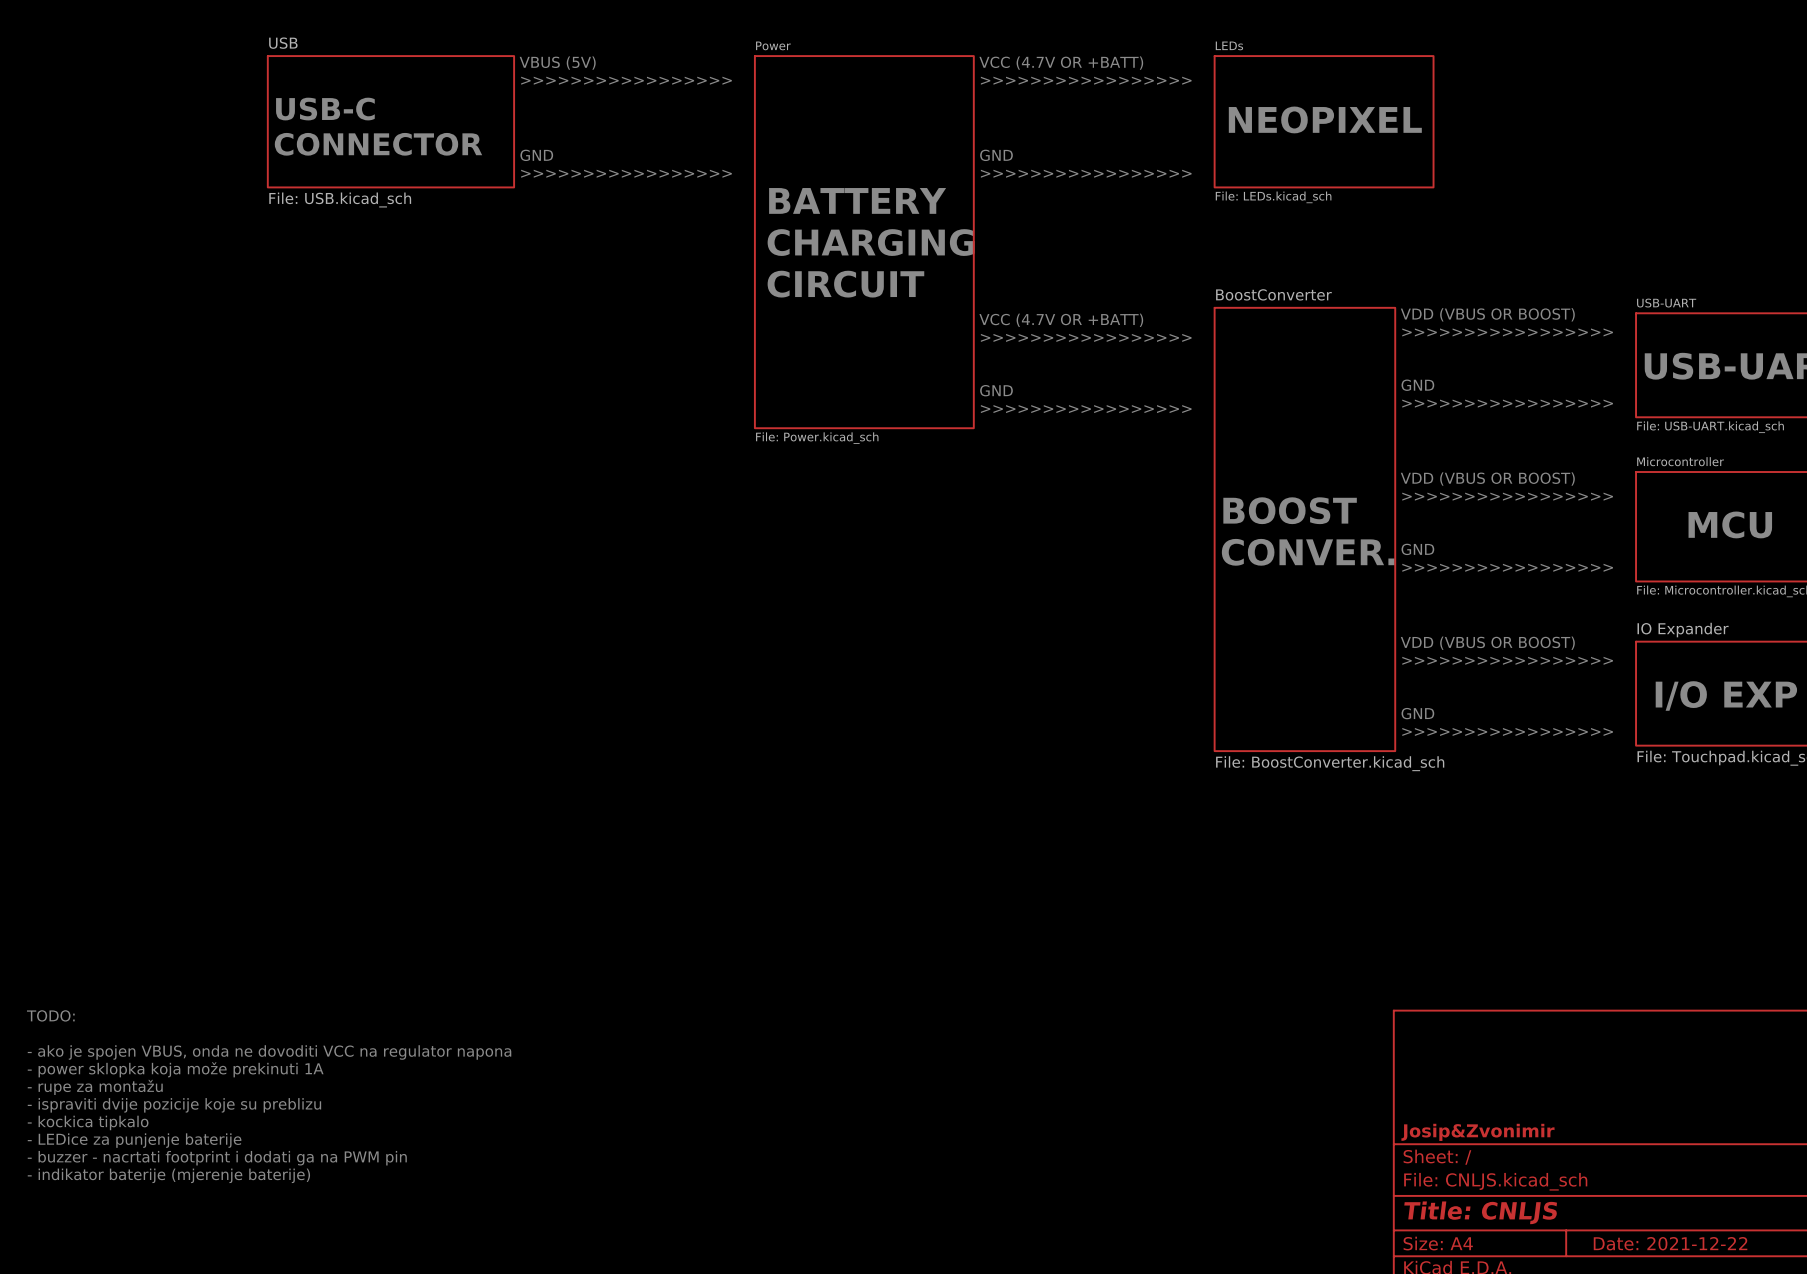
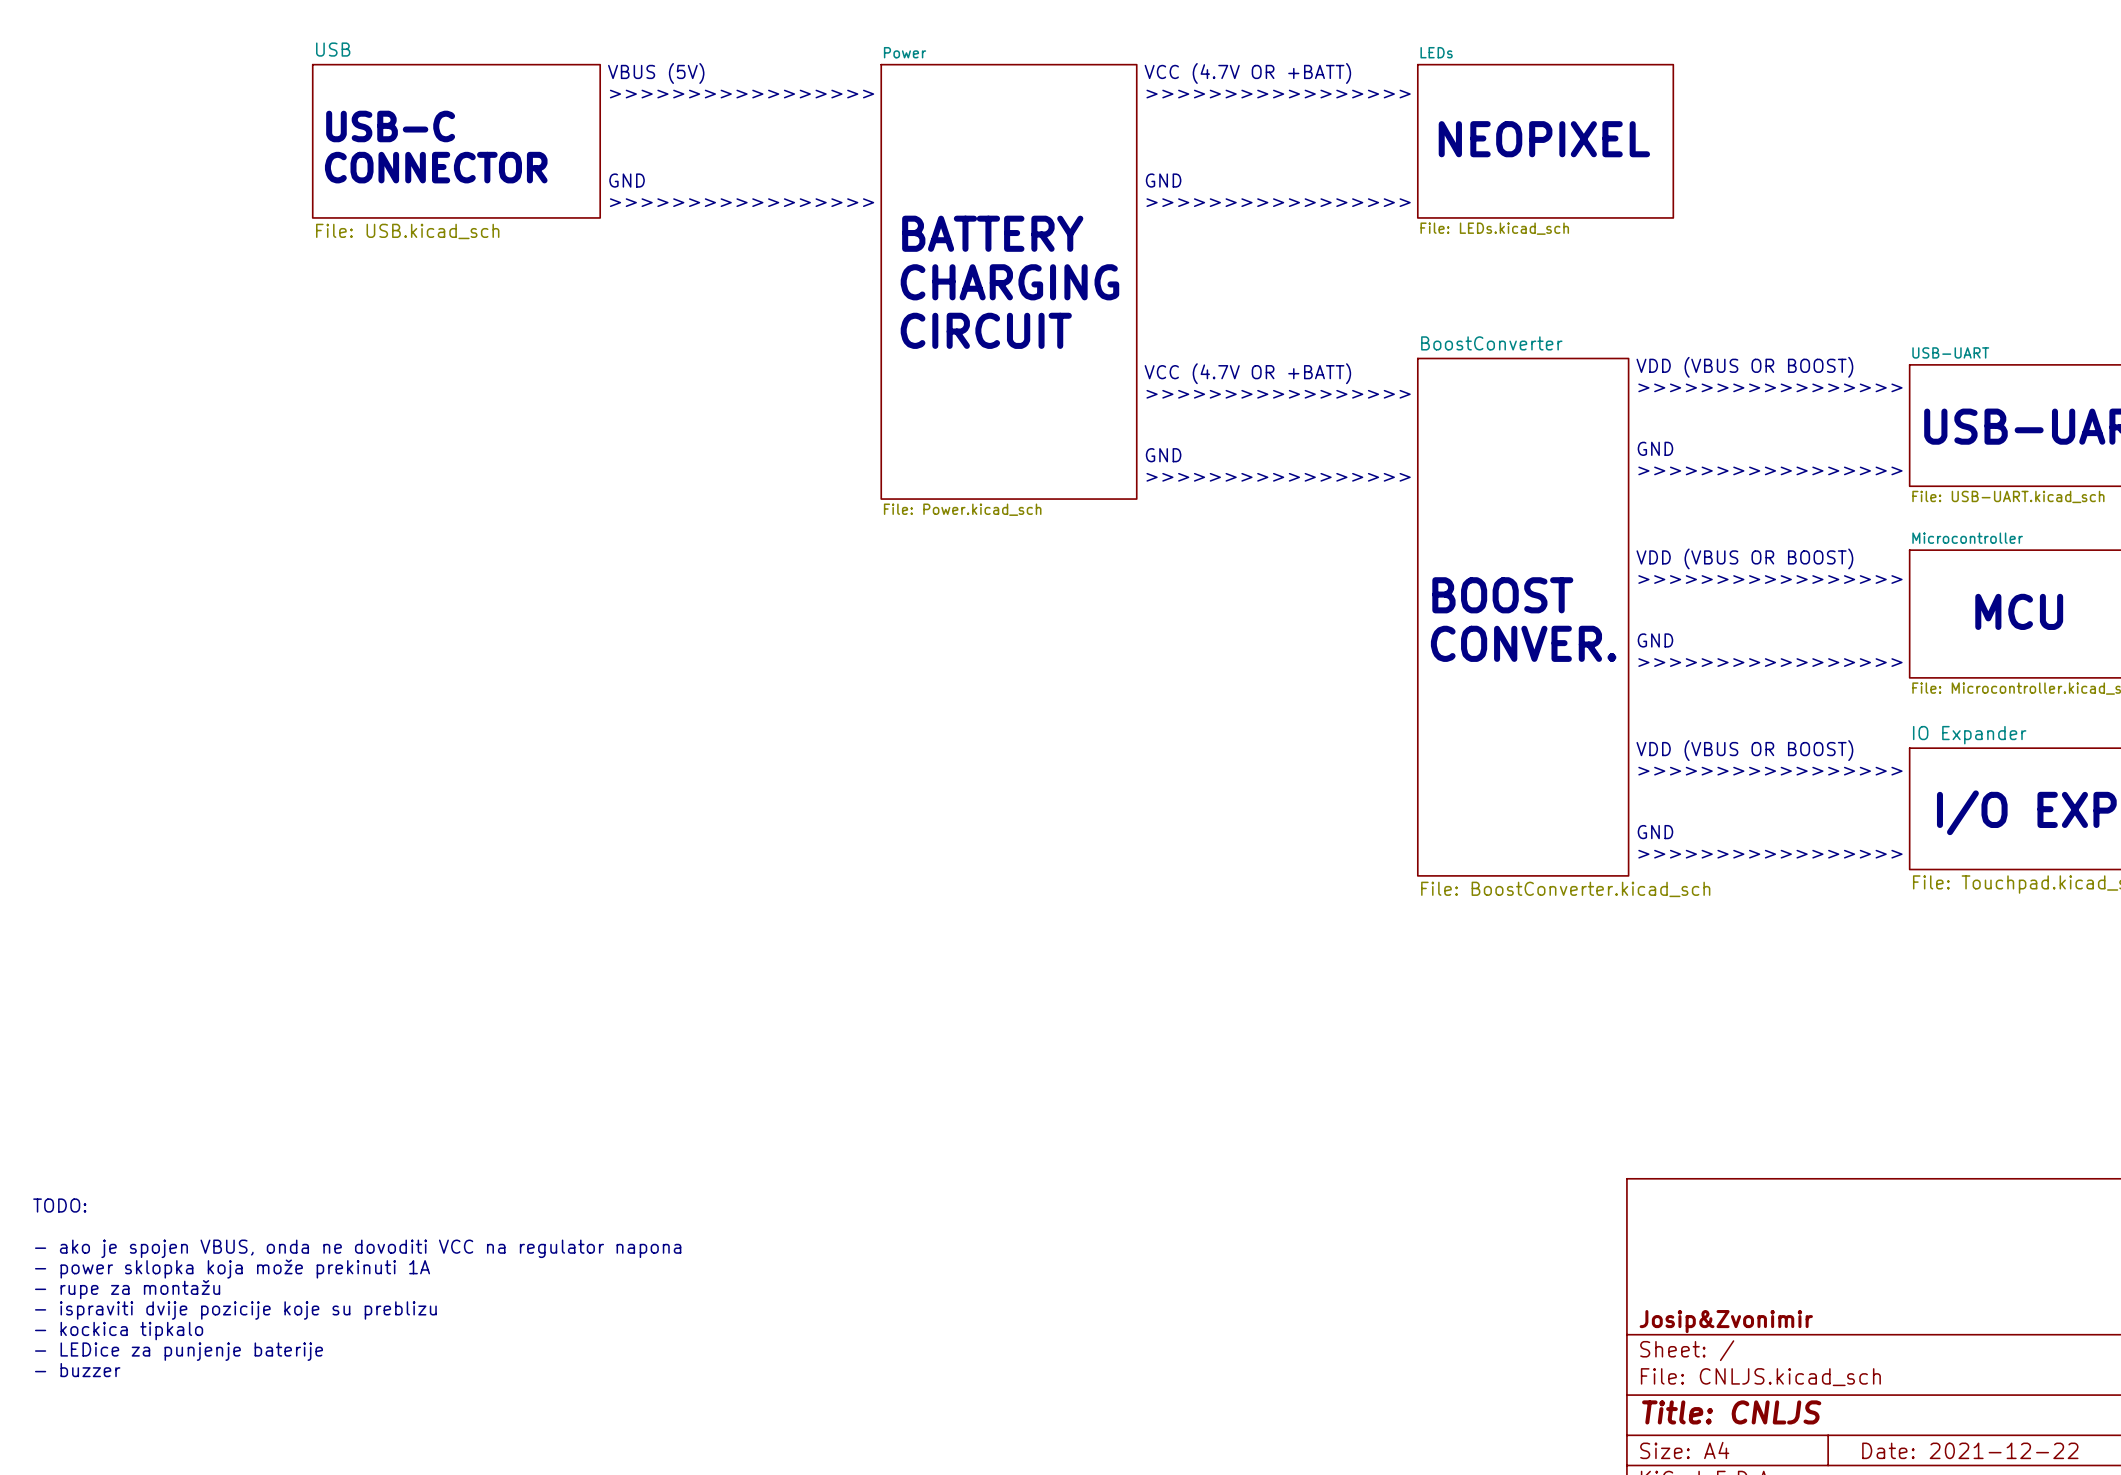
text position: TODO: (50, 1015) -> TODO: (59, 1205)
text: - ako je spojen VBUS, onda ne dovoditi VCC na regulator napona (269, 1052) -> none
text: - power sklopka koja može prekinuti 1A (175, 1069) -> - ako je spojen VBUS, onda ne dovoditi VCC na regulator napona (358, 1248)
text: - rupe za montažu (95, 1087) -> - power sklopka koja može prekinuti 1A (232, 1269)
text: - ispraviti dvije pozicije koje su preblizu (174, 1105) -> - rupe za montažu (127, 1289)
text: - kockica tipkalo (88, 1122) -> - ispraviti dvije pozicije koje su preblizu (235, 1310)
text: - LEDice za punjenje baterije (134, 1140) -> - kockica tipkalo (119, 1331)
text: - buzzer - nacrtati footprint i dodati ga na PWM pin (217, 1158) -> - LEDice za punjenje baterije (178, 1351)
text: - indikator baterije (mjerenje baterije) (168, 1175) -> - buzzer (77, 1370)

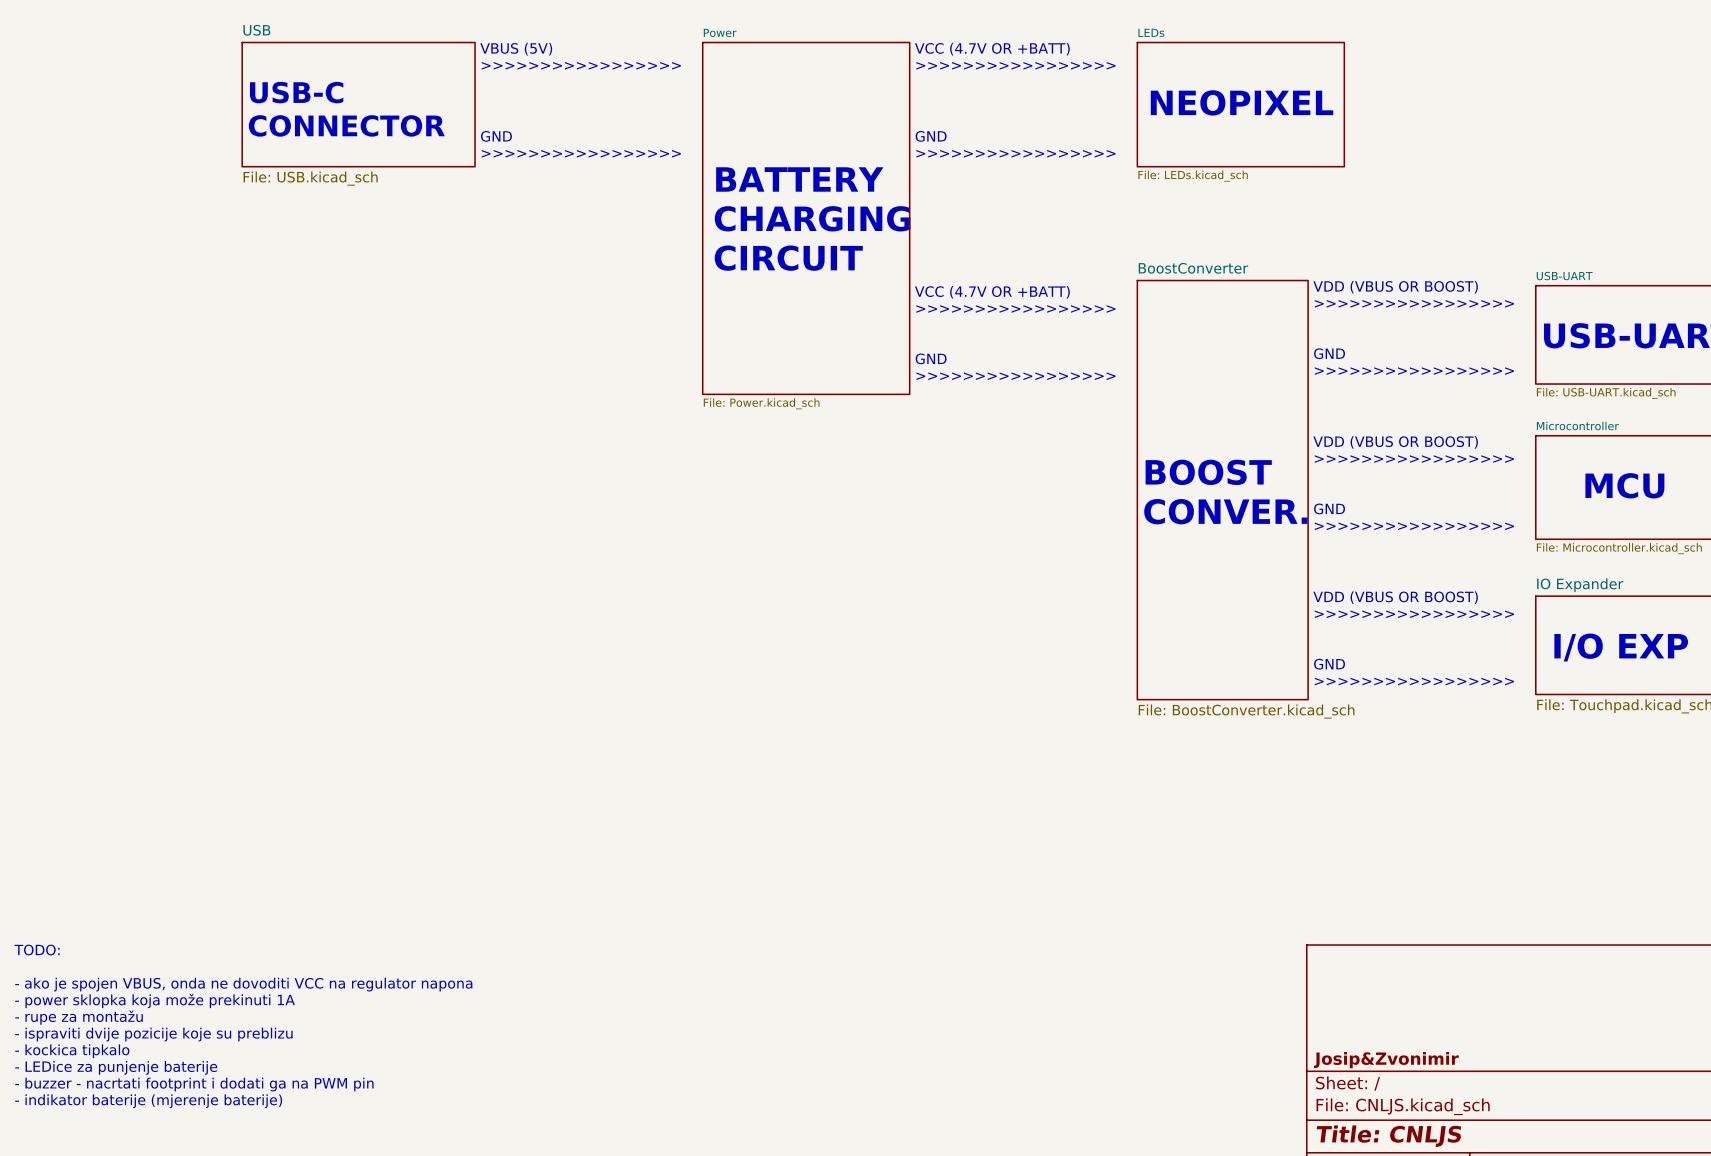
text position: TODO: (59, 1205) -> TODO: (37, 950)
text: none -> - ako je spojen VBUS, onda ne dovoditi VCC na regulator napona (243, 984)
text: - ako je spojen VBUS, onda ne dovoditi VCC na regulator napona (358, 1248) -> - power sklopka koja može prekinuti 1A (155, 1000)
text: - power sklopka koja može prekinuti 1A (232, 1269) -> - rupe za montažu (79, 1017)
text: - rupe za montažu (127, 1289) -> - ispraviti dvije pozicije koje su preblizu (153, 1034)
text: - ispraviti dvije pozicije koje su preblizu (235, 1310) -> - kockica tipkalo (72, 1051)
text: - kockica tipkalo (119, 1331) -> - LEDice za punjenje baterije (116, 1067)
text: - LEDice za punjenje baterije (178, 1351) -> - buzzer - nacrtati footprint i dodati ga na PWM pin (194, 1084)
text: - buzzer (77, 1370) -> - indikator baterije (mjerenje baterije) (148, 1101)

